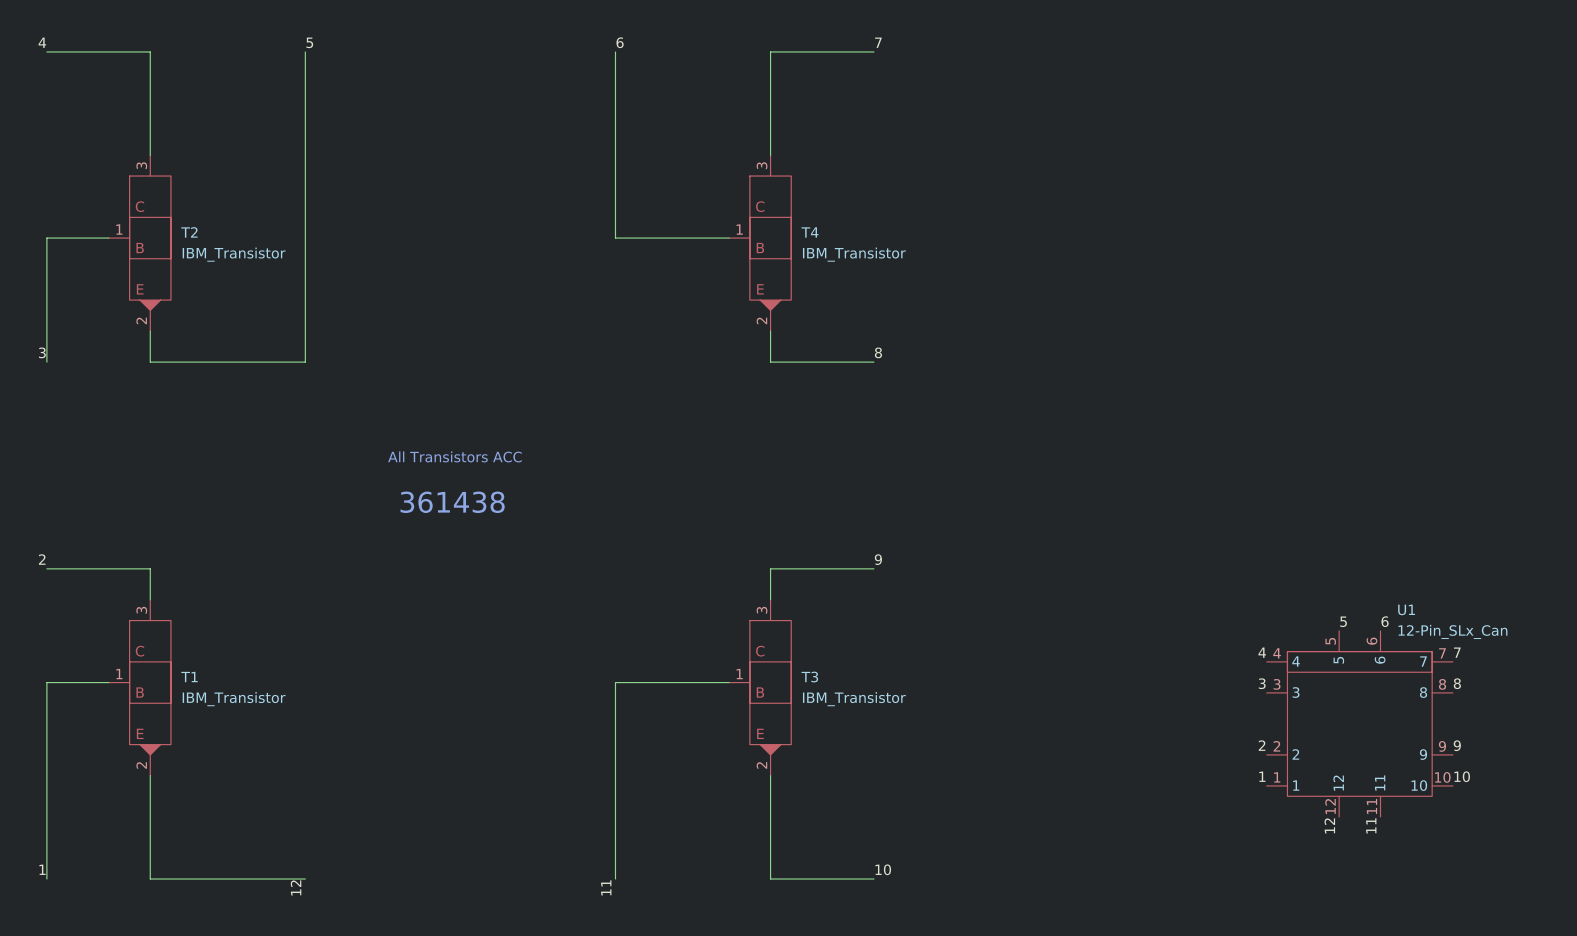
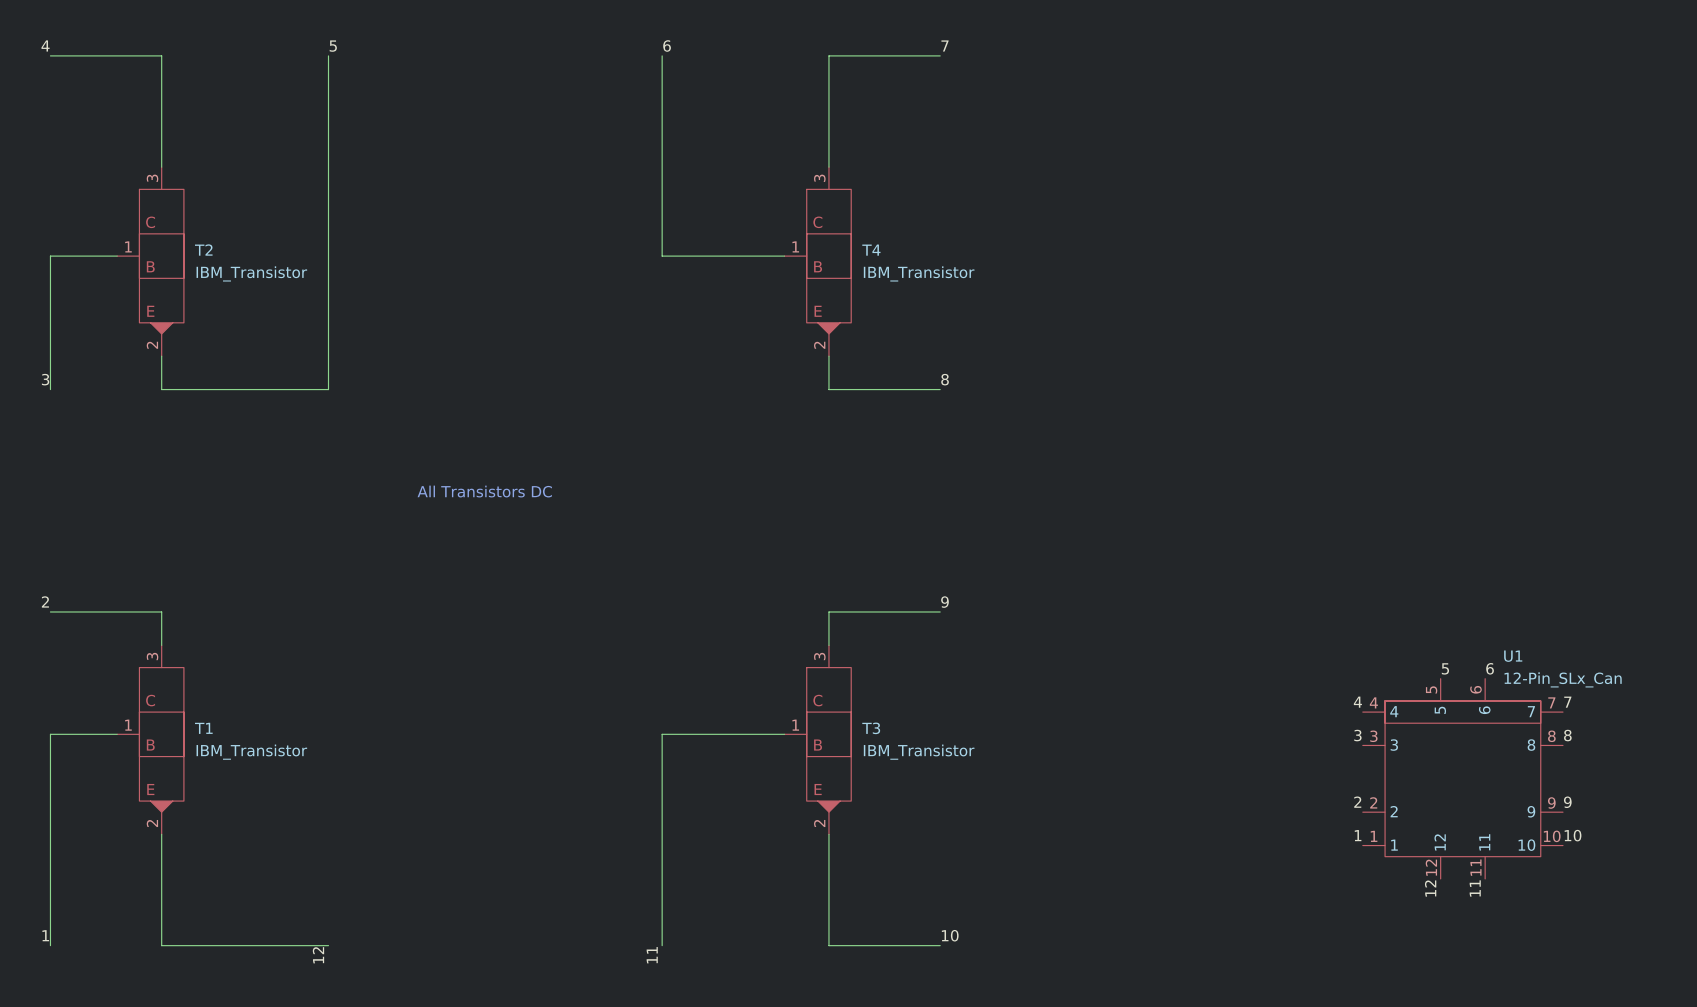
text: All Transistors ACC (454, 456) -> All Transistors DC (484, 491)
text: 361438 (452, 502) -> none

